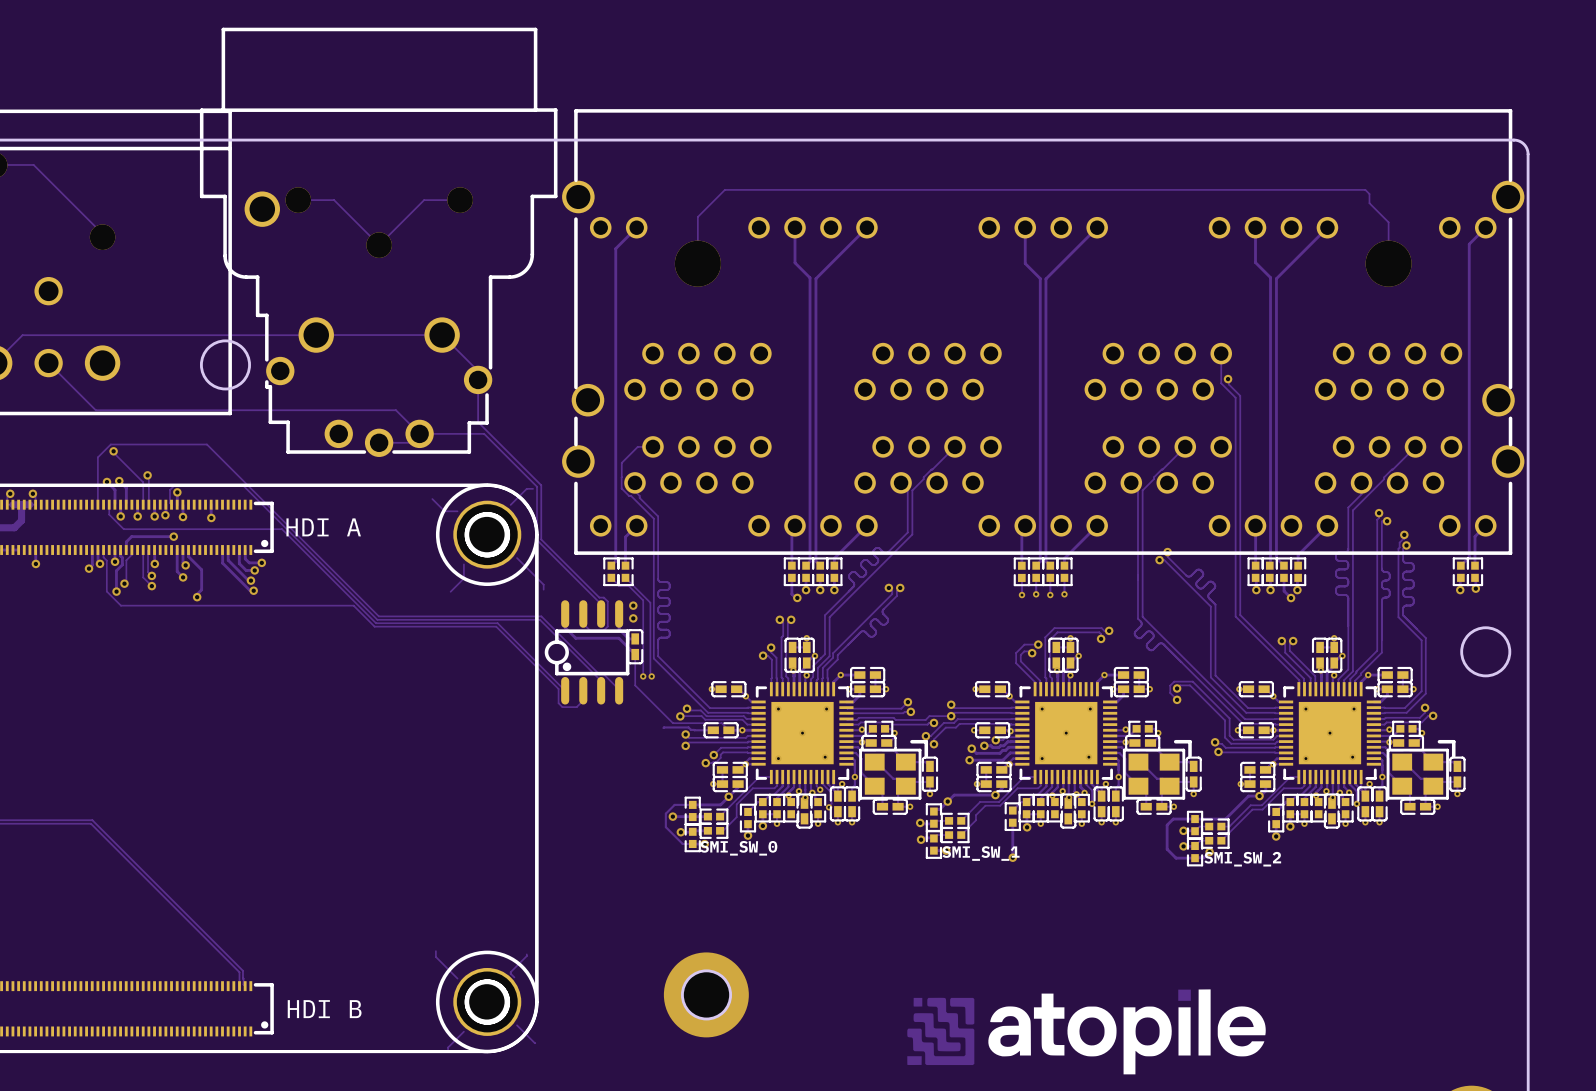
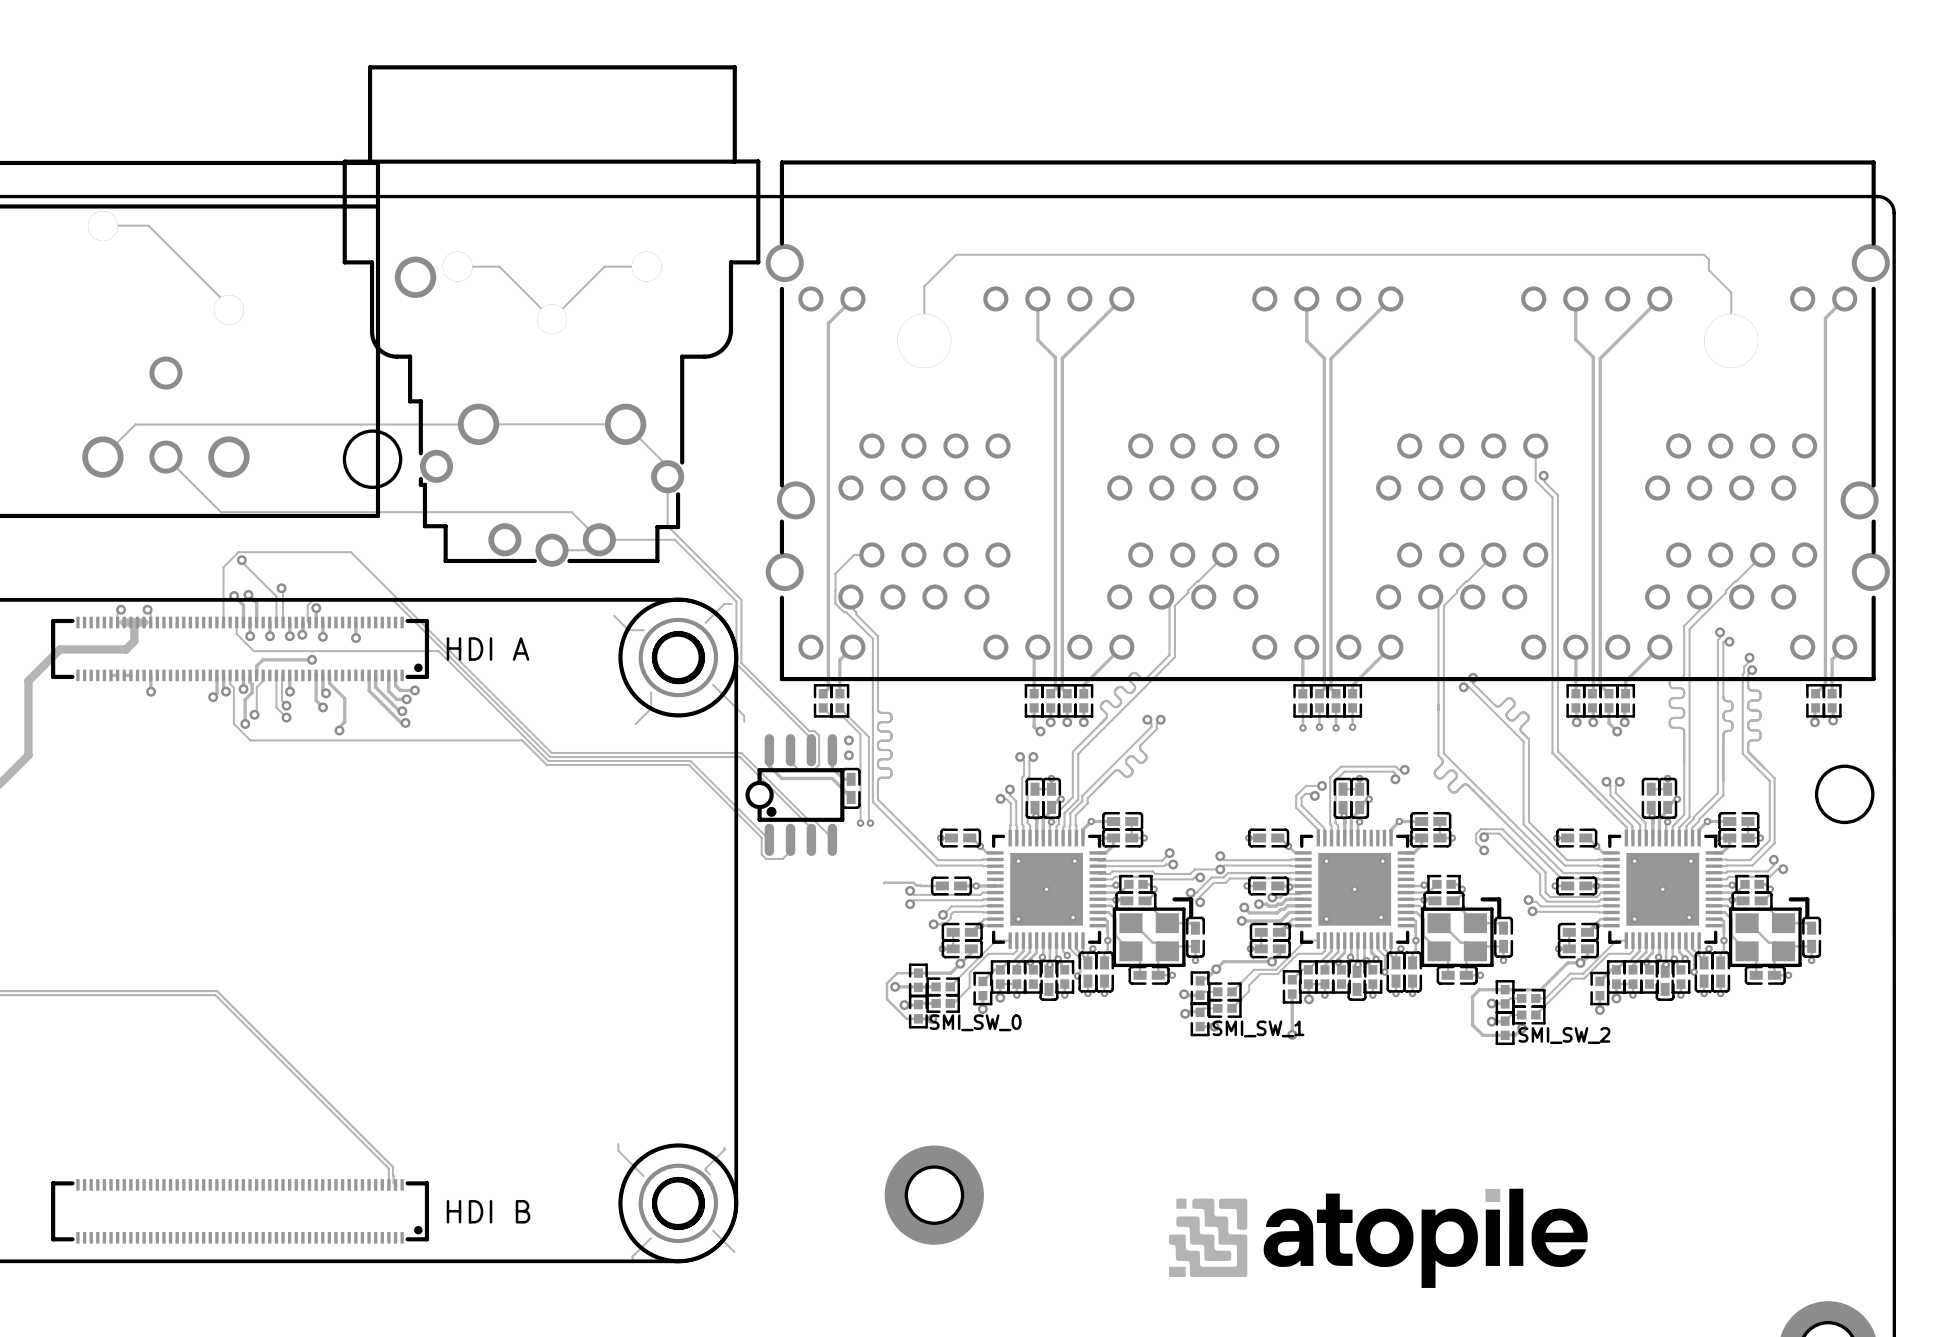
track: (635, 654) (635, 685) (672, 723) (721, 723) (728, 730) -> none
track: (687, 708) (700, 710) (706, 716) (743, 716) (746, 718) (758, 718) -> none
via: (687, 708) -> none
track: (680, 716) (701, 716) (705, 719) (742, 719) (747, 724) (758, 724) -> none
via: (680, 716) -> none

